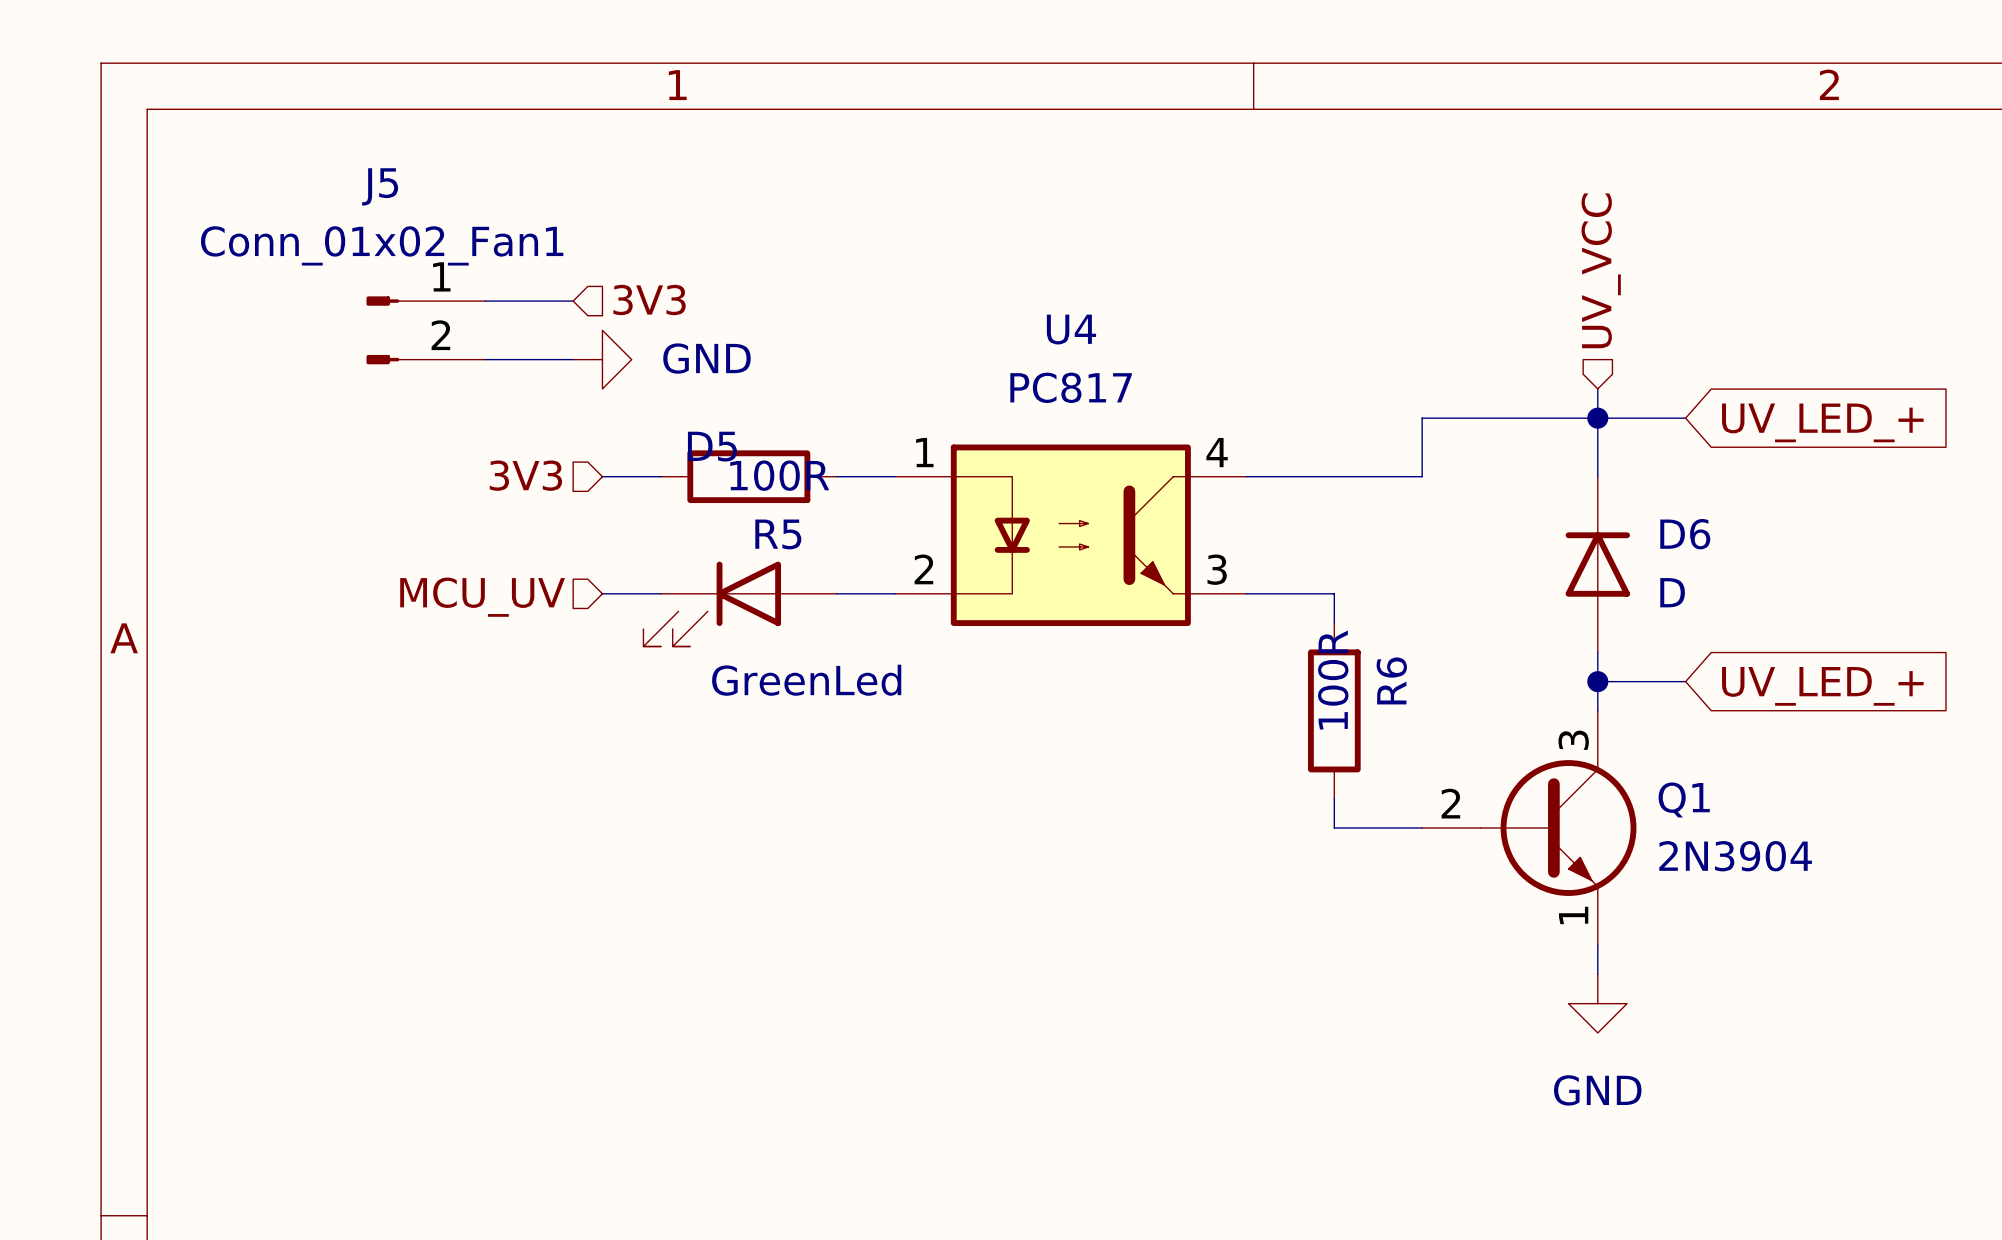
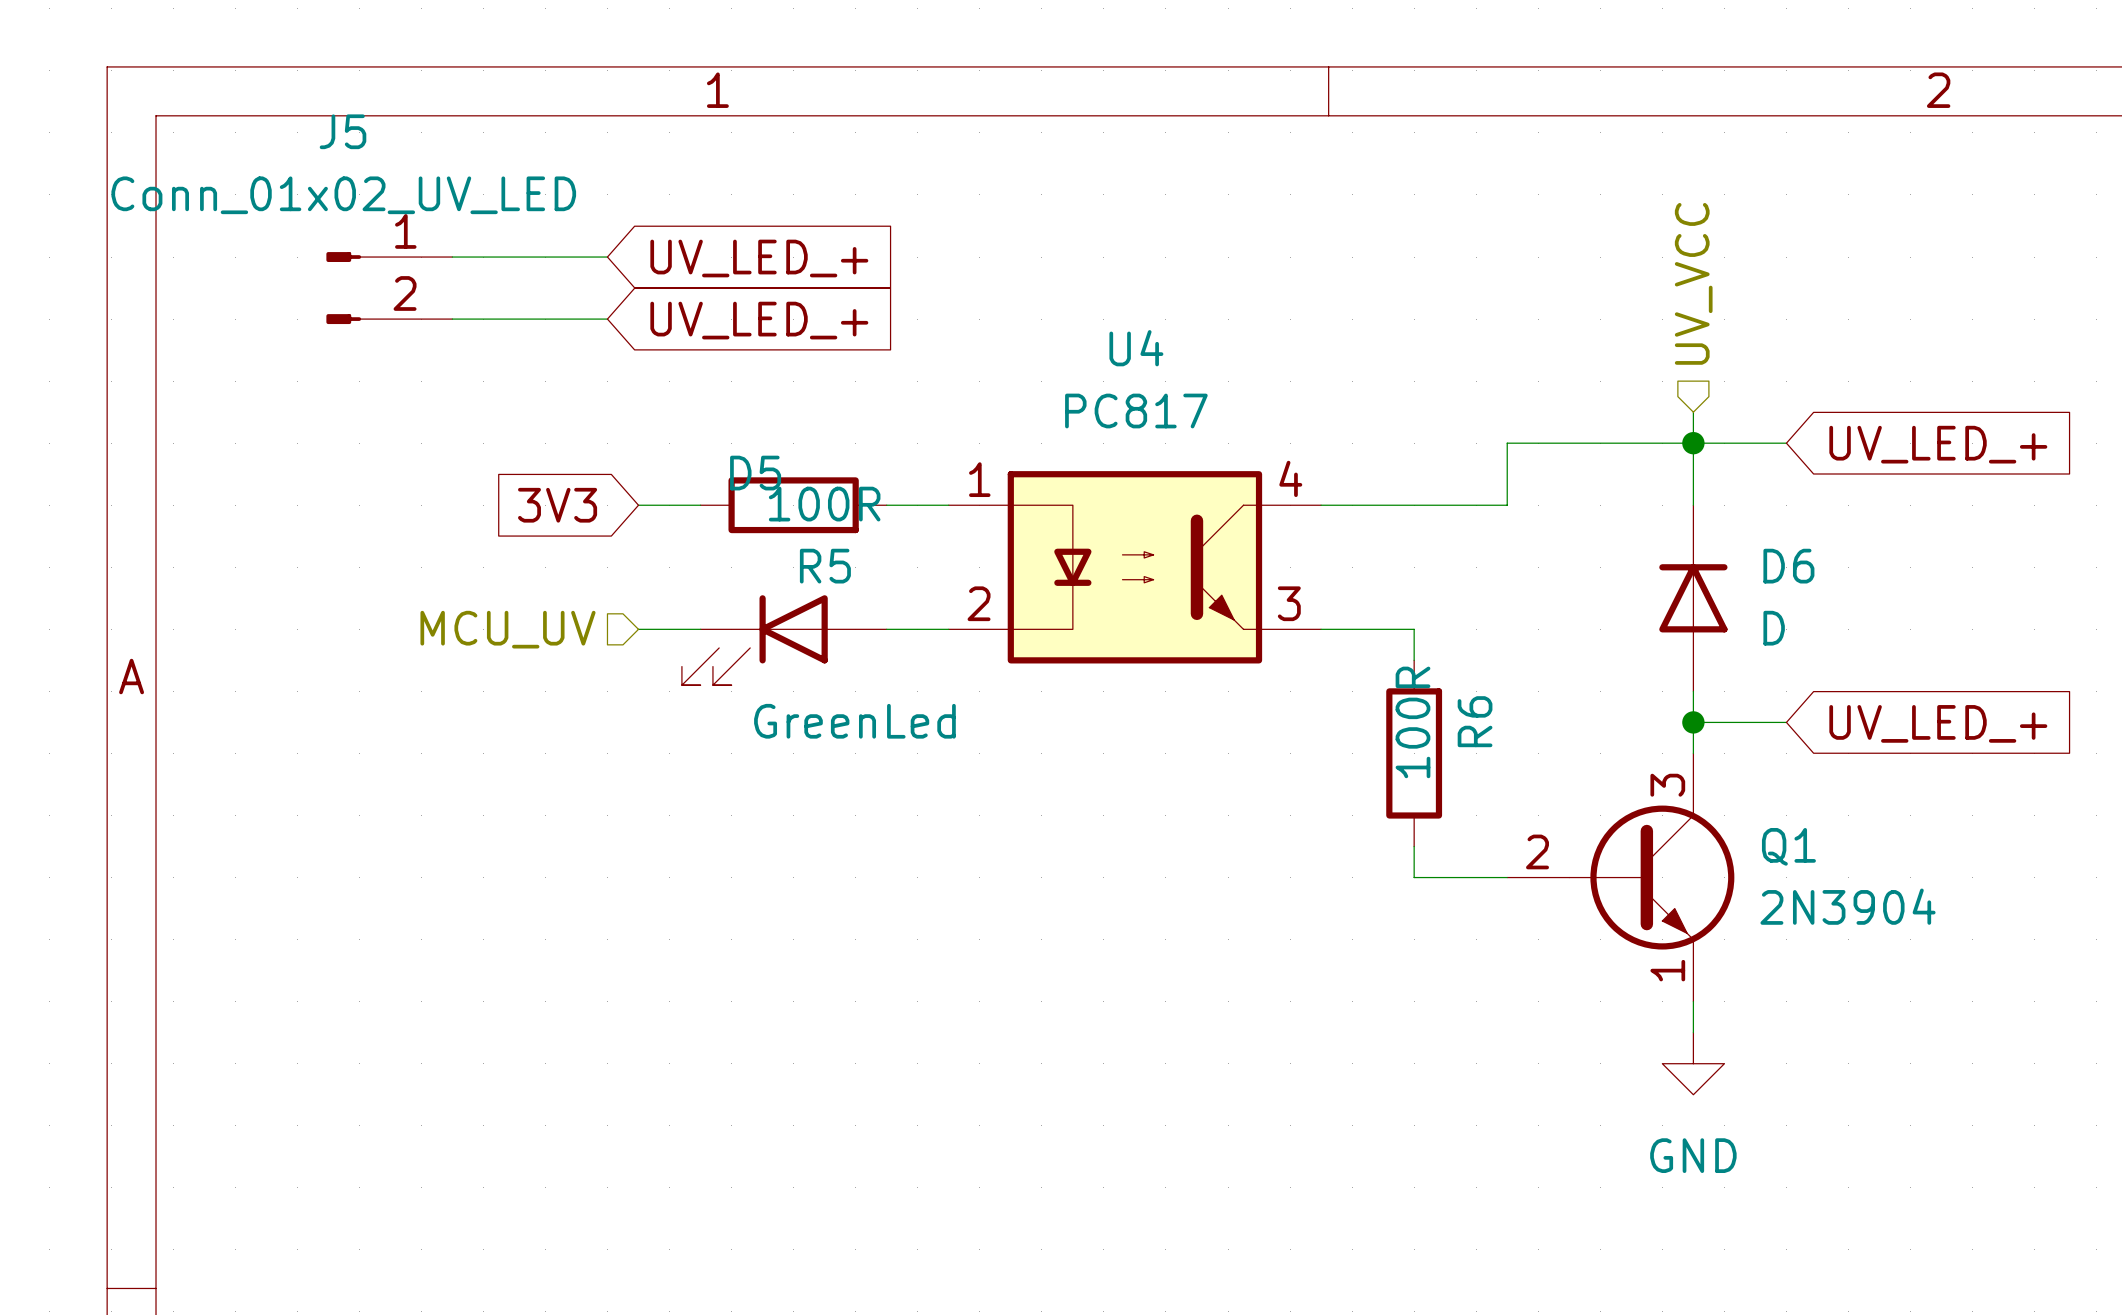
wire: none -> (452, 257) (607, 257)
J5 value: Conn_01x02_Fan1 (382, 245) -> Conn_01x02_UV_LED (343, 195)
global label: none -> UV_LED_+ (759, 258)
hierarchical label: 3V3 (649, 299) -> none
global label: none -> UV_LED_+ (759, 320)
J5 position: (425, 330) -> (389, 288)
wire: (485, 359) (573, 359) -> none
power symbol: GND (602, 359) -> none
hierarchical label: 3V3 (525, 475) -> none
global label: none -> 3V3 (557, 505)

